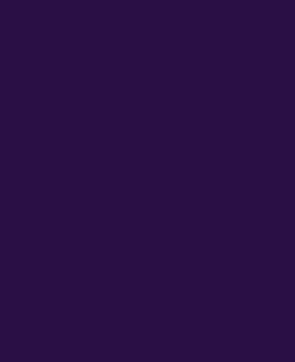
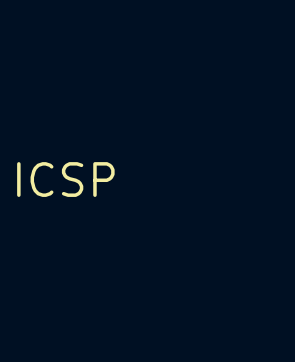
text: none -> ICSP (65, 179)

